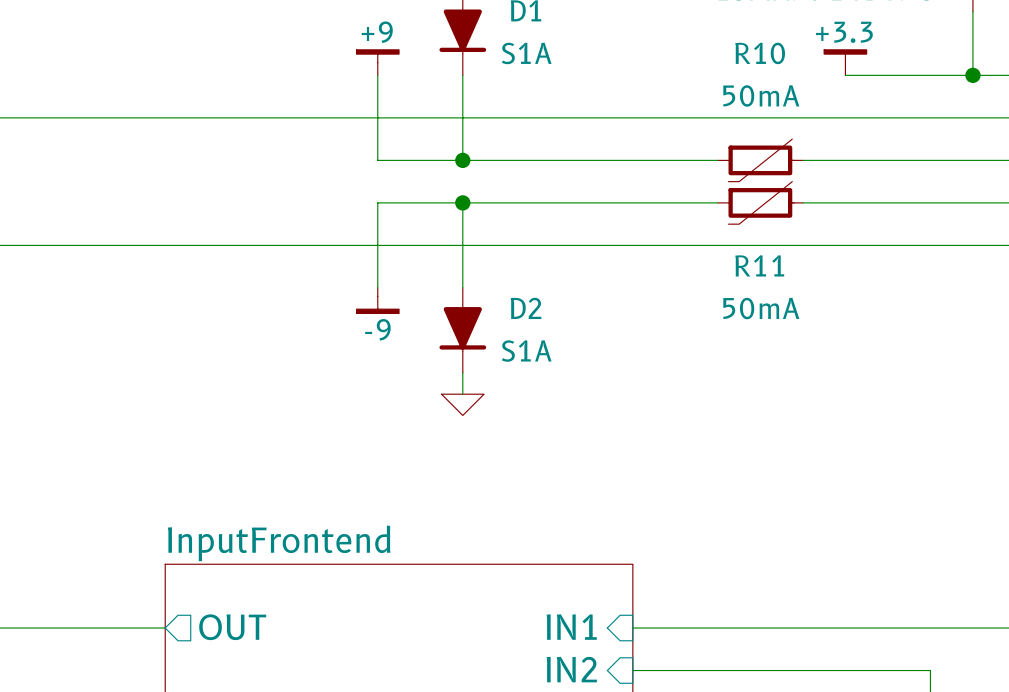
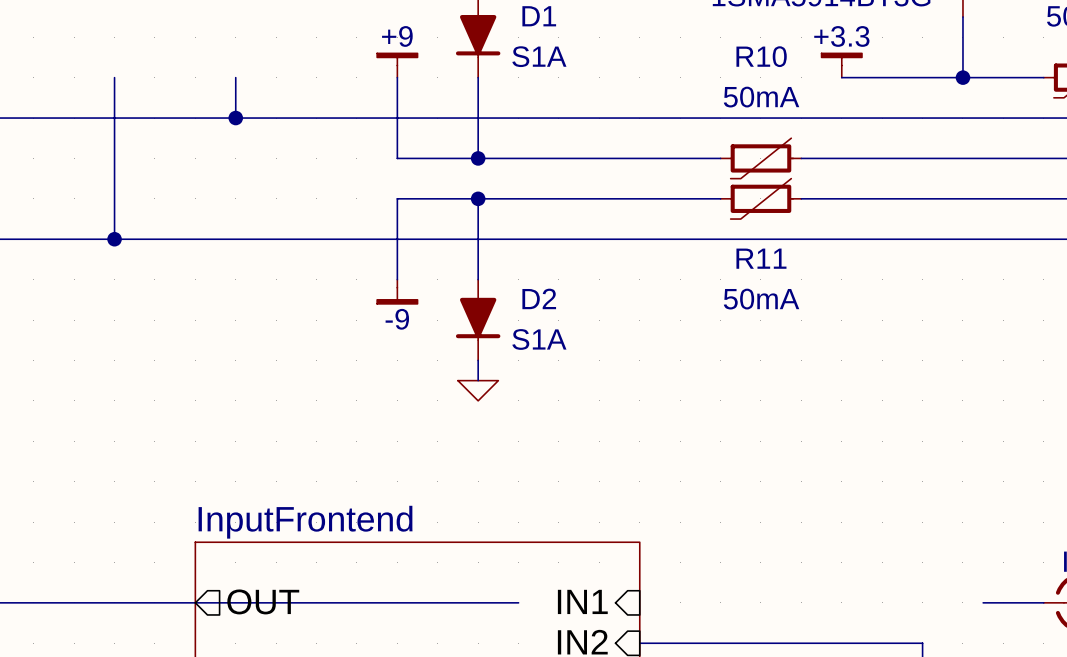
wire: none -> (114, 77) (114, 239)
wire: none -> (235, 77) (235, 118)
junction: none -> (235, 118)
junction: none -> (114, 239)
wire: none -> (195, 602) (518, 602)
wire: (632, 628) (994, 628) -> none

